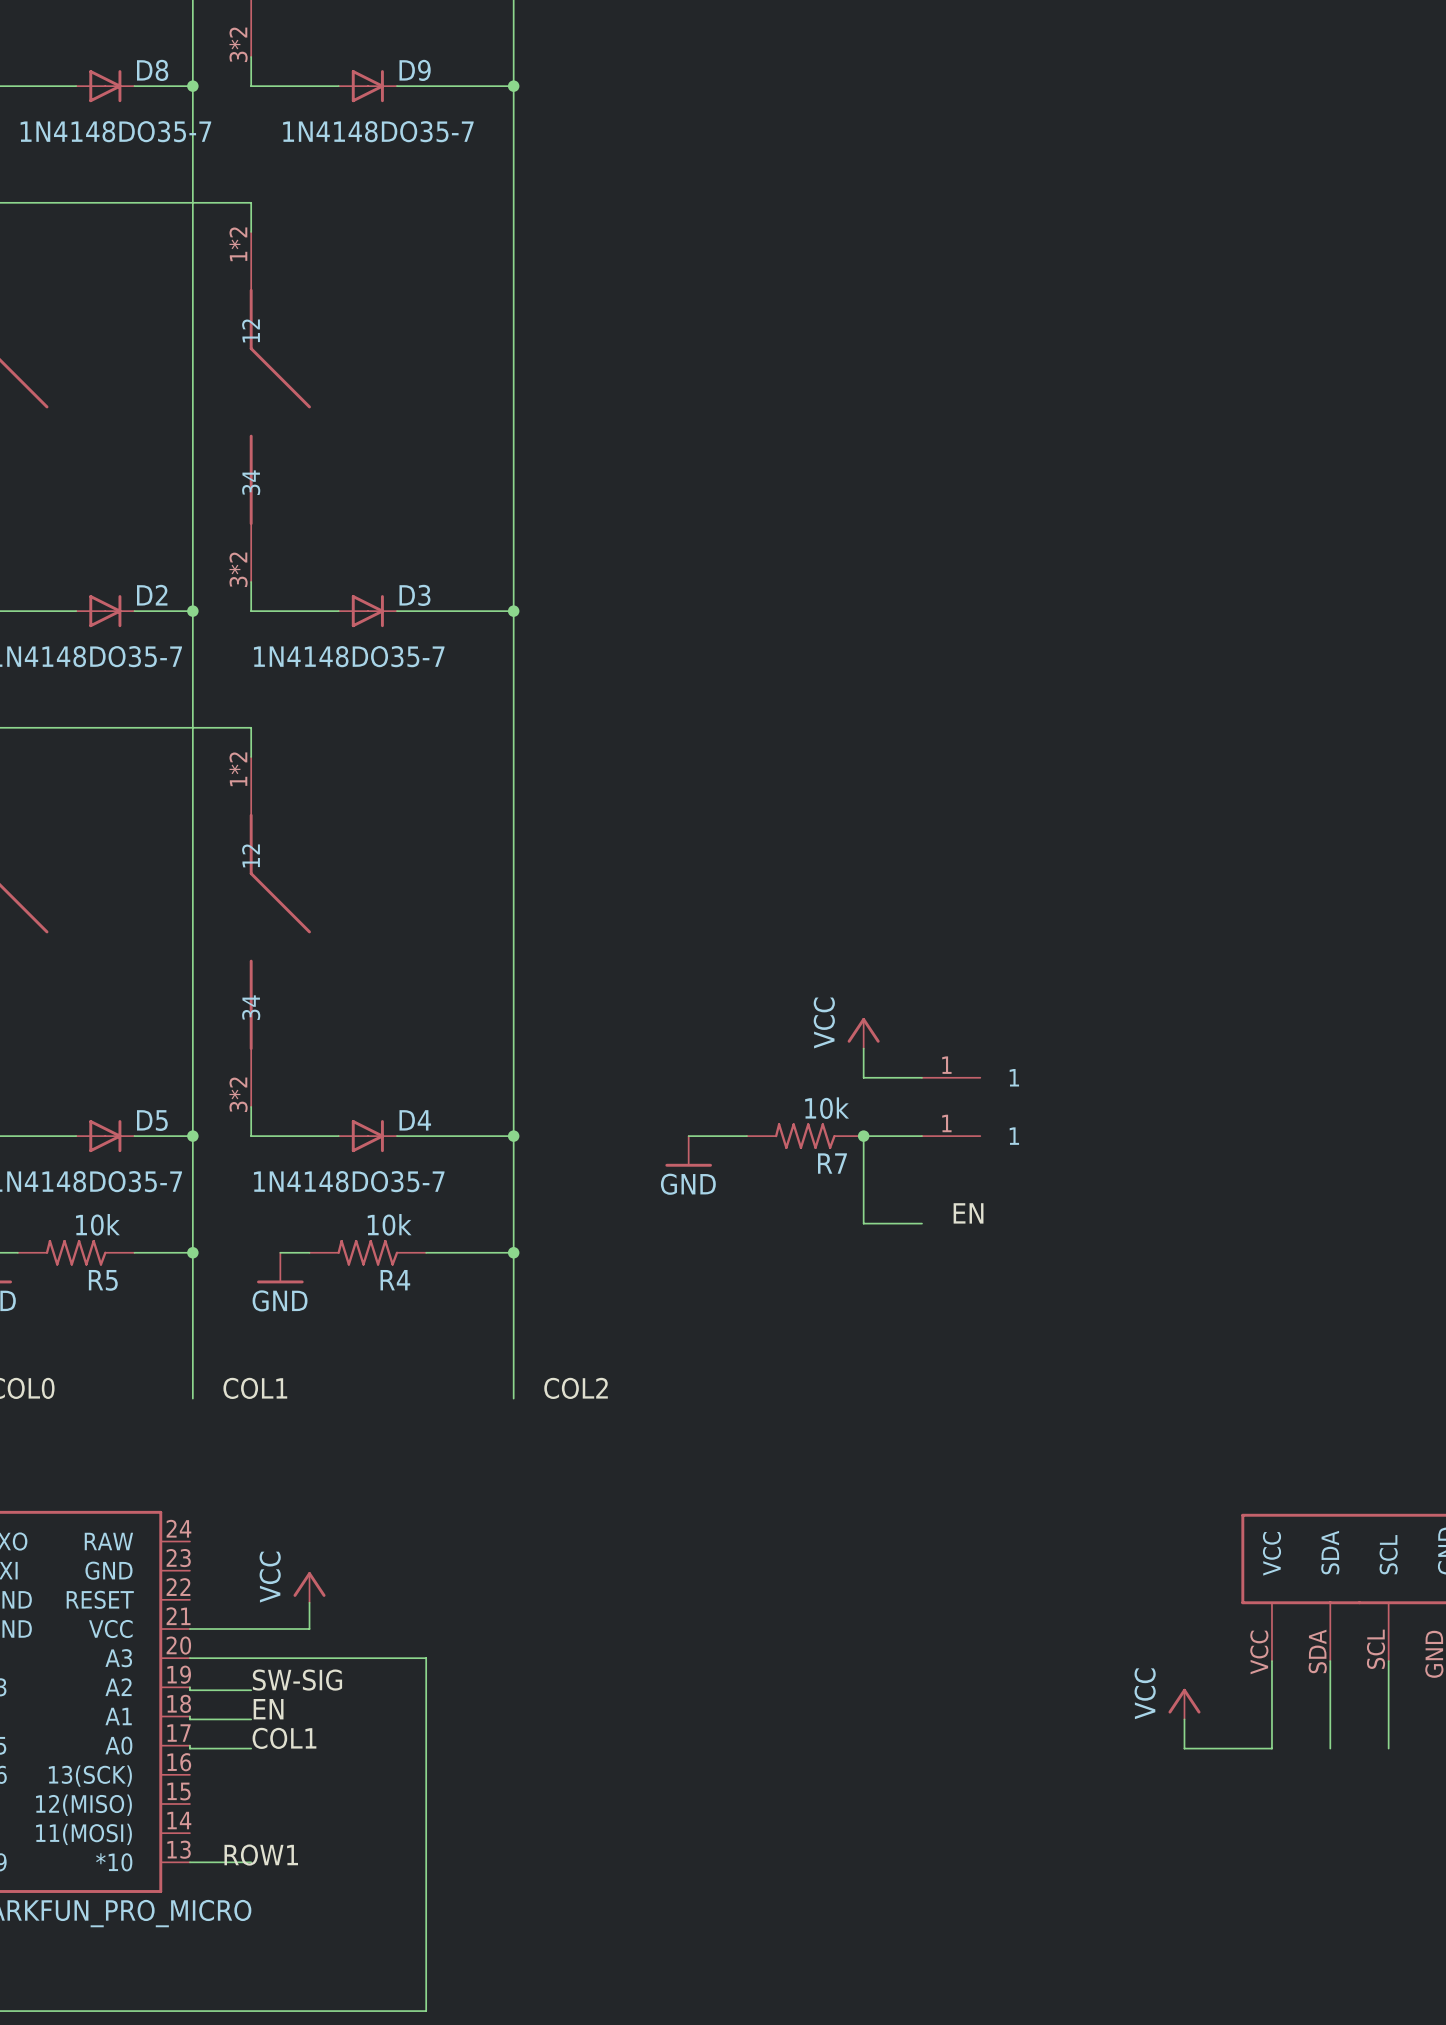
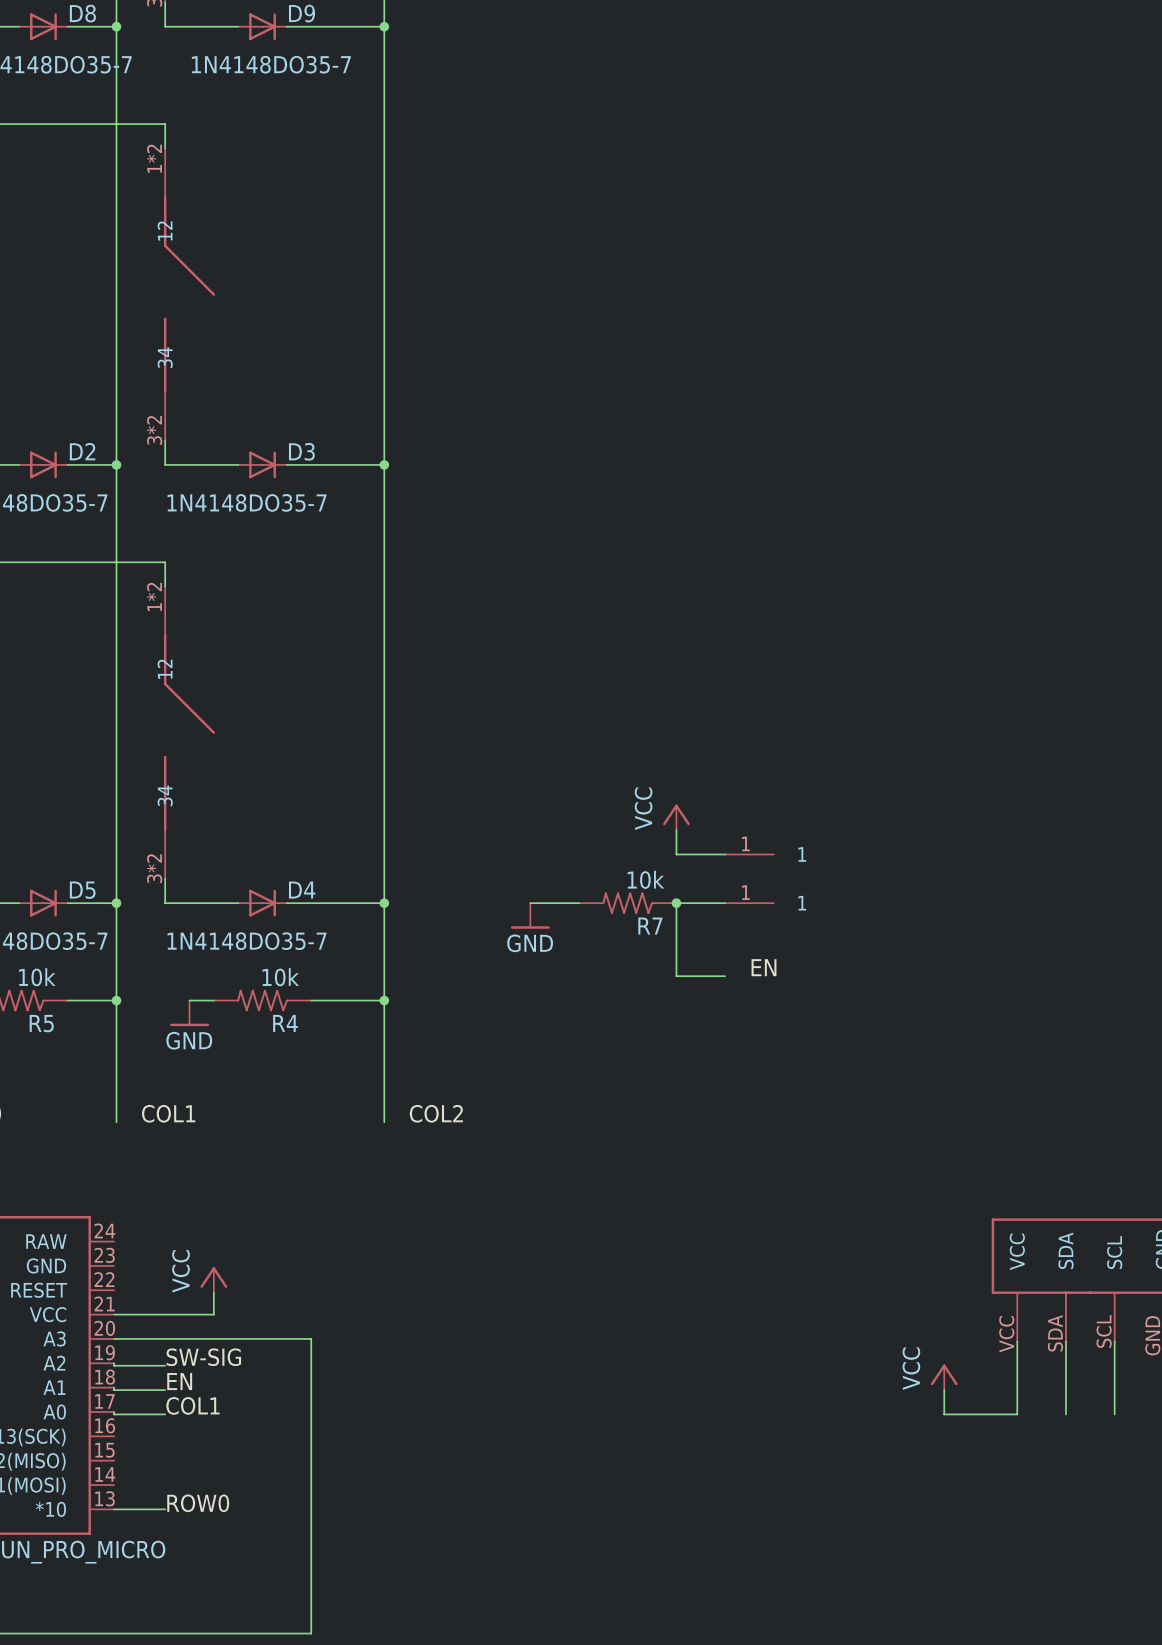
label: ROW1 (261, 1855) -> ROW0 (198, 1503)

